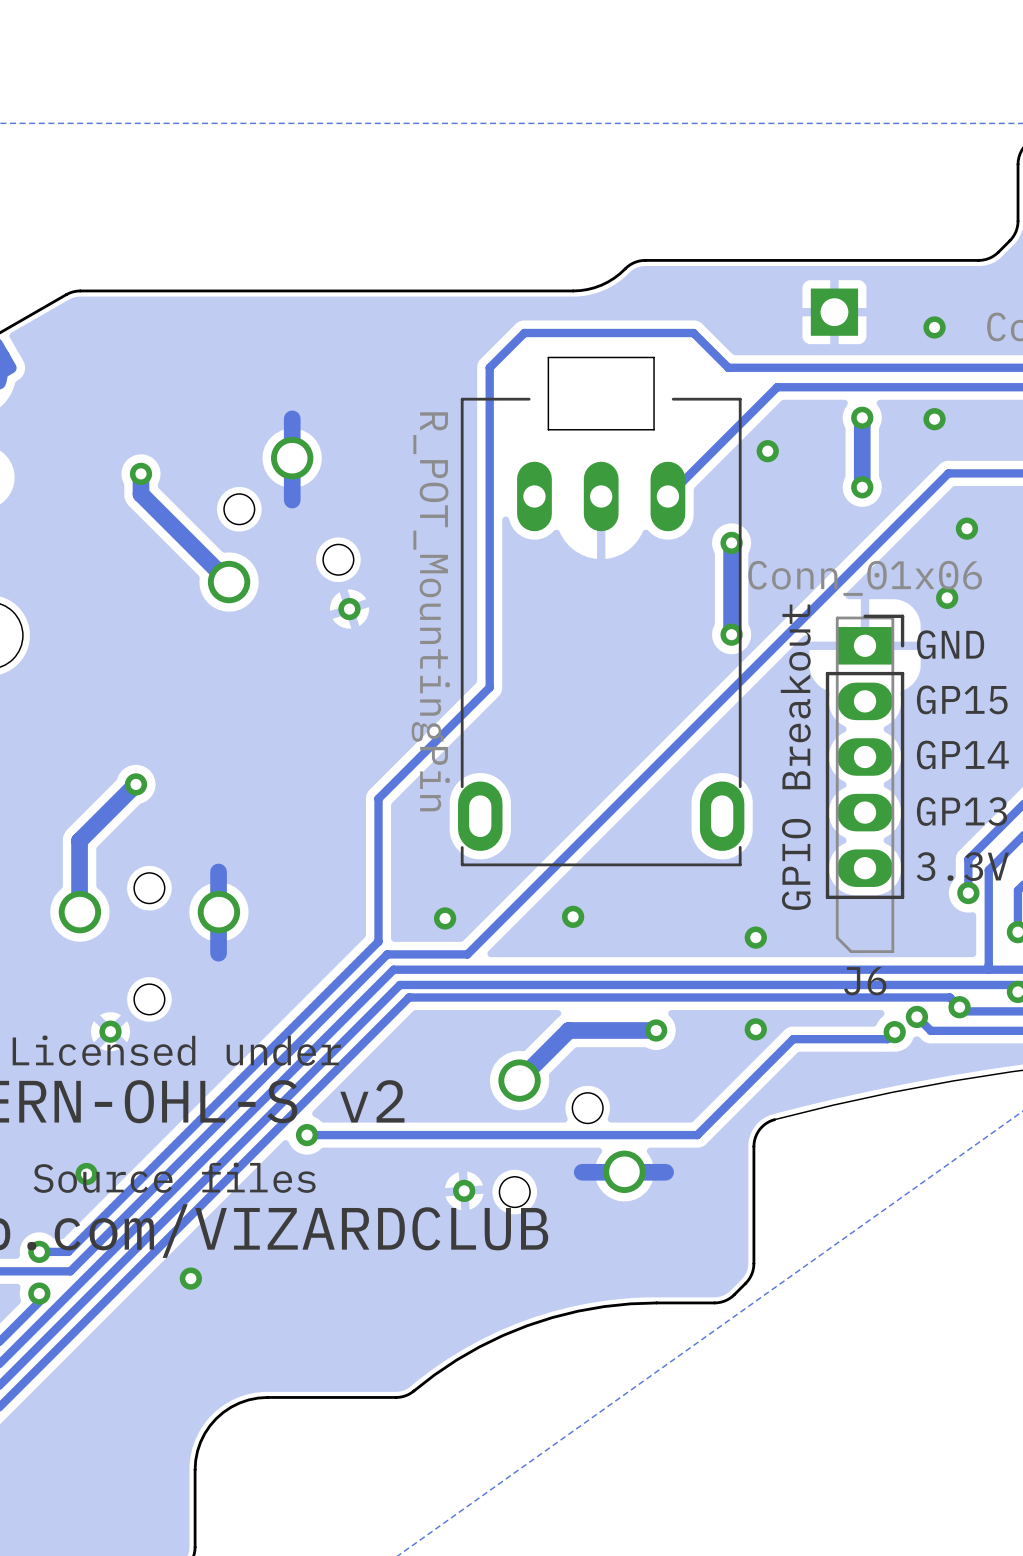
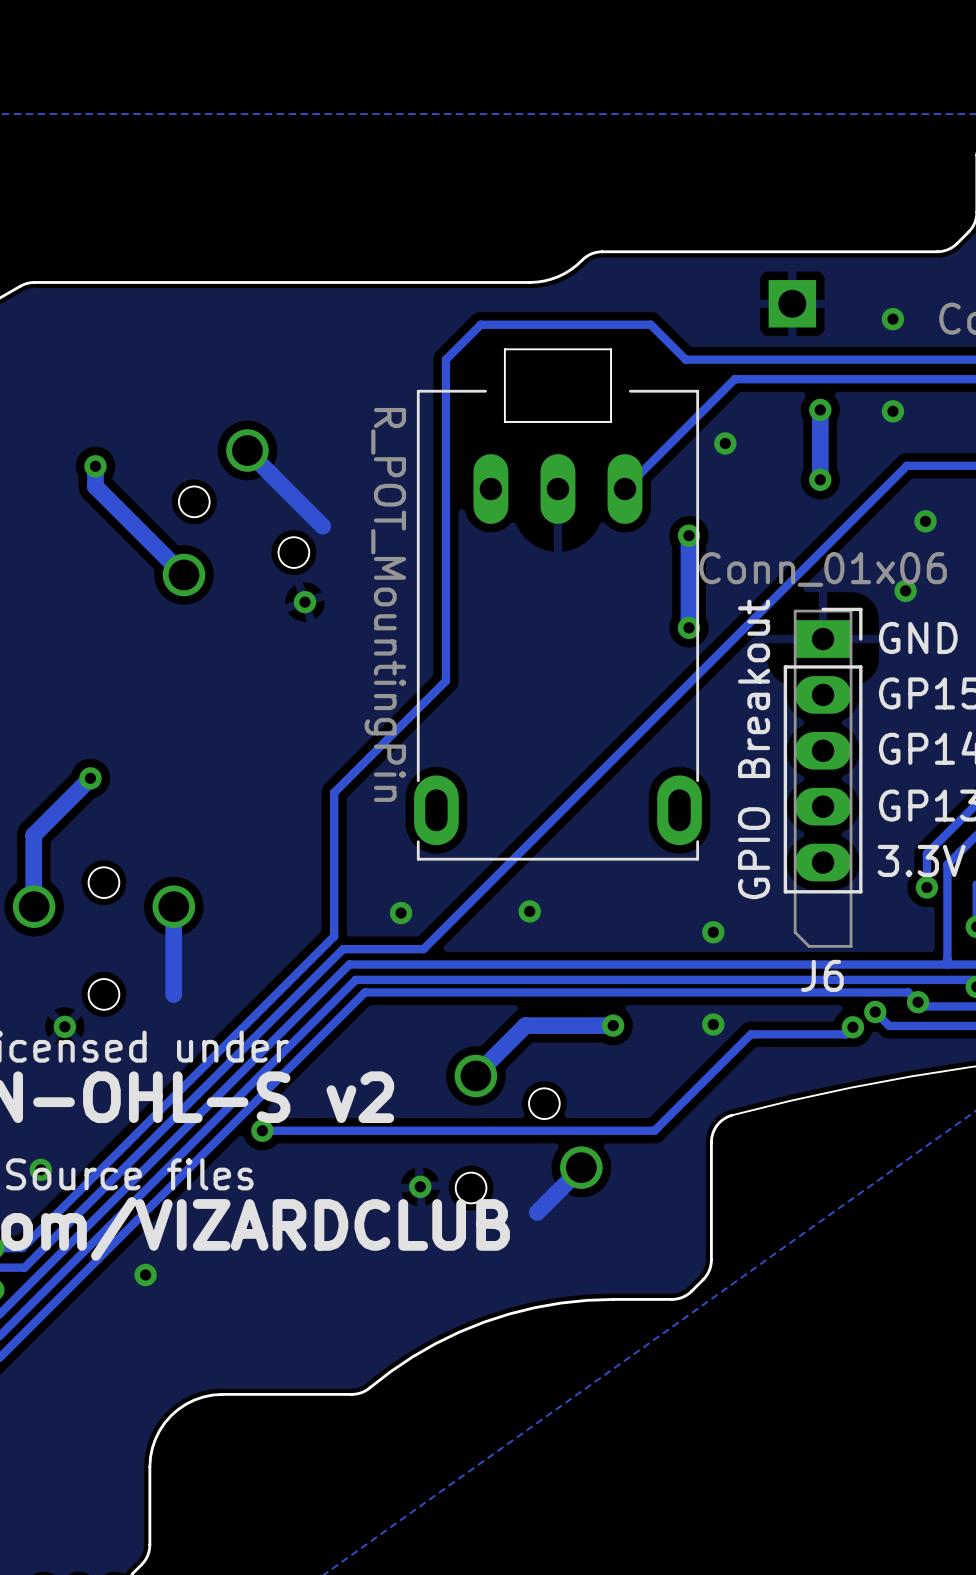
track: (292, 418) (292, 500) -> none
track: none -> (250, 453) (322, 526)
track: (218, 871) (218, 953) -> (173, 912) (173, 994)
track: (665, 1172) (582, 1172) -> none
track: none -> (576, 1173) (537, 1212)

